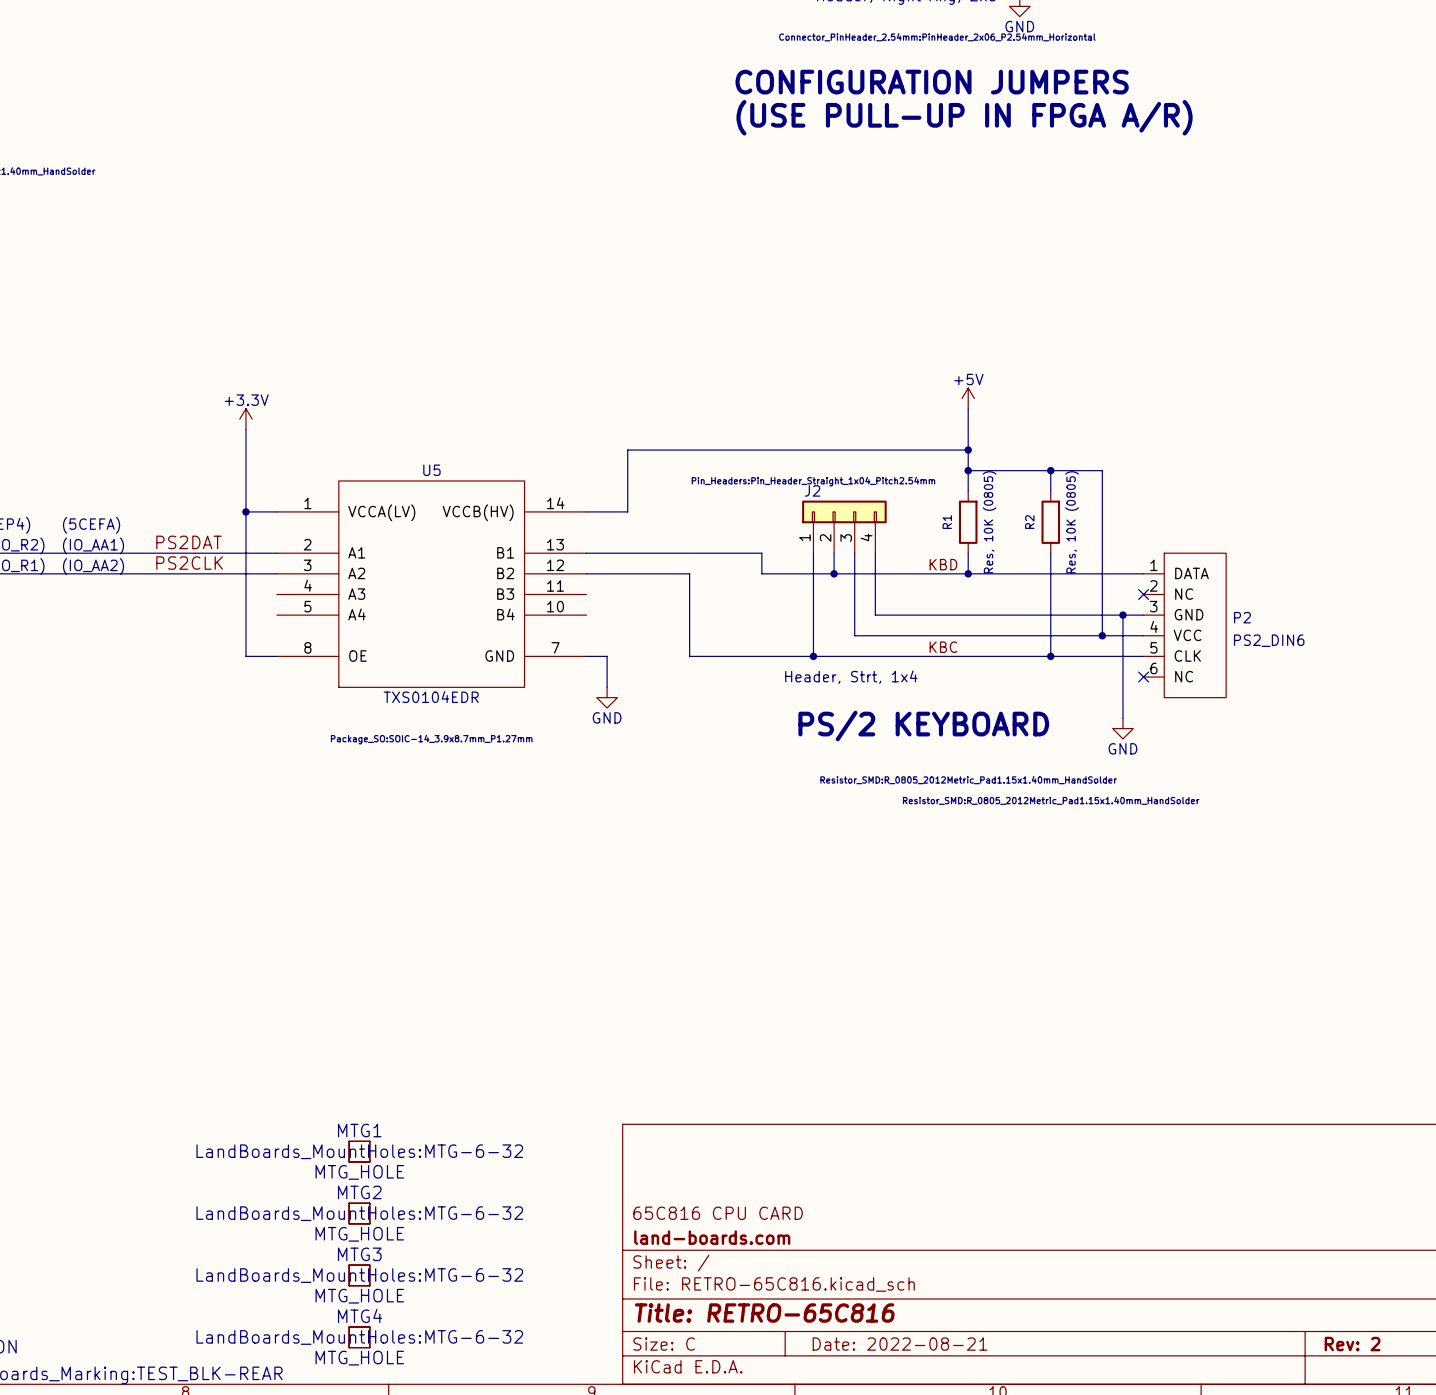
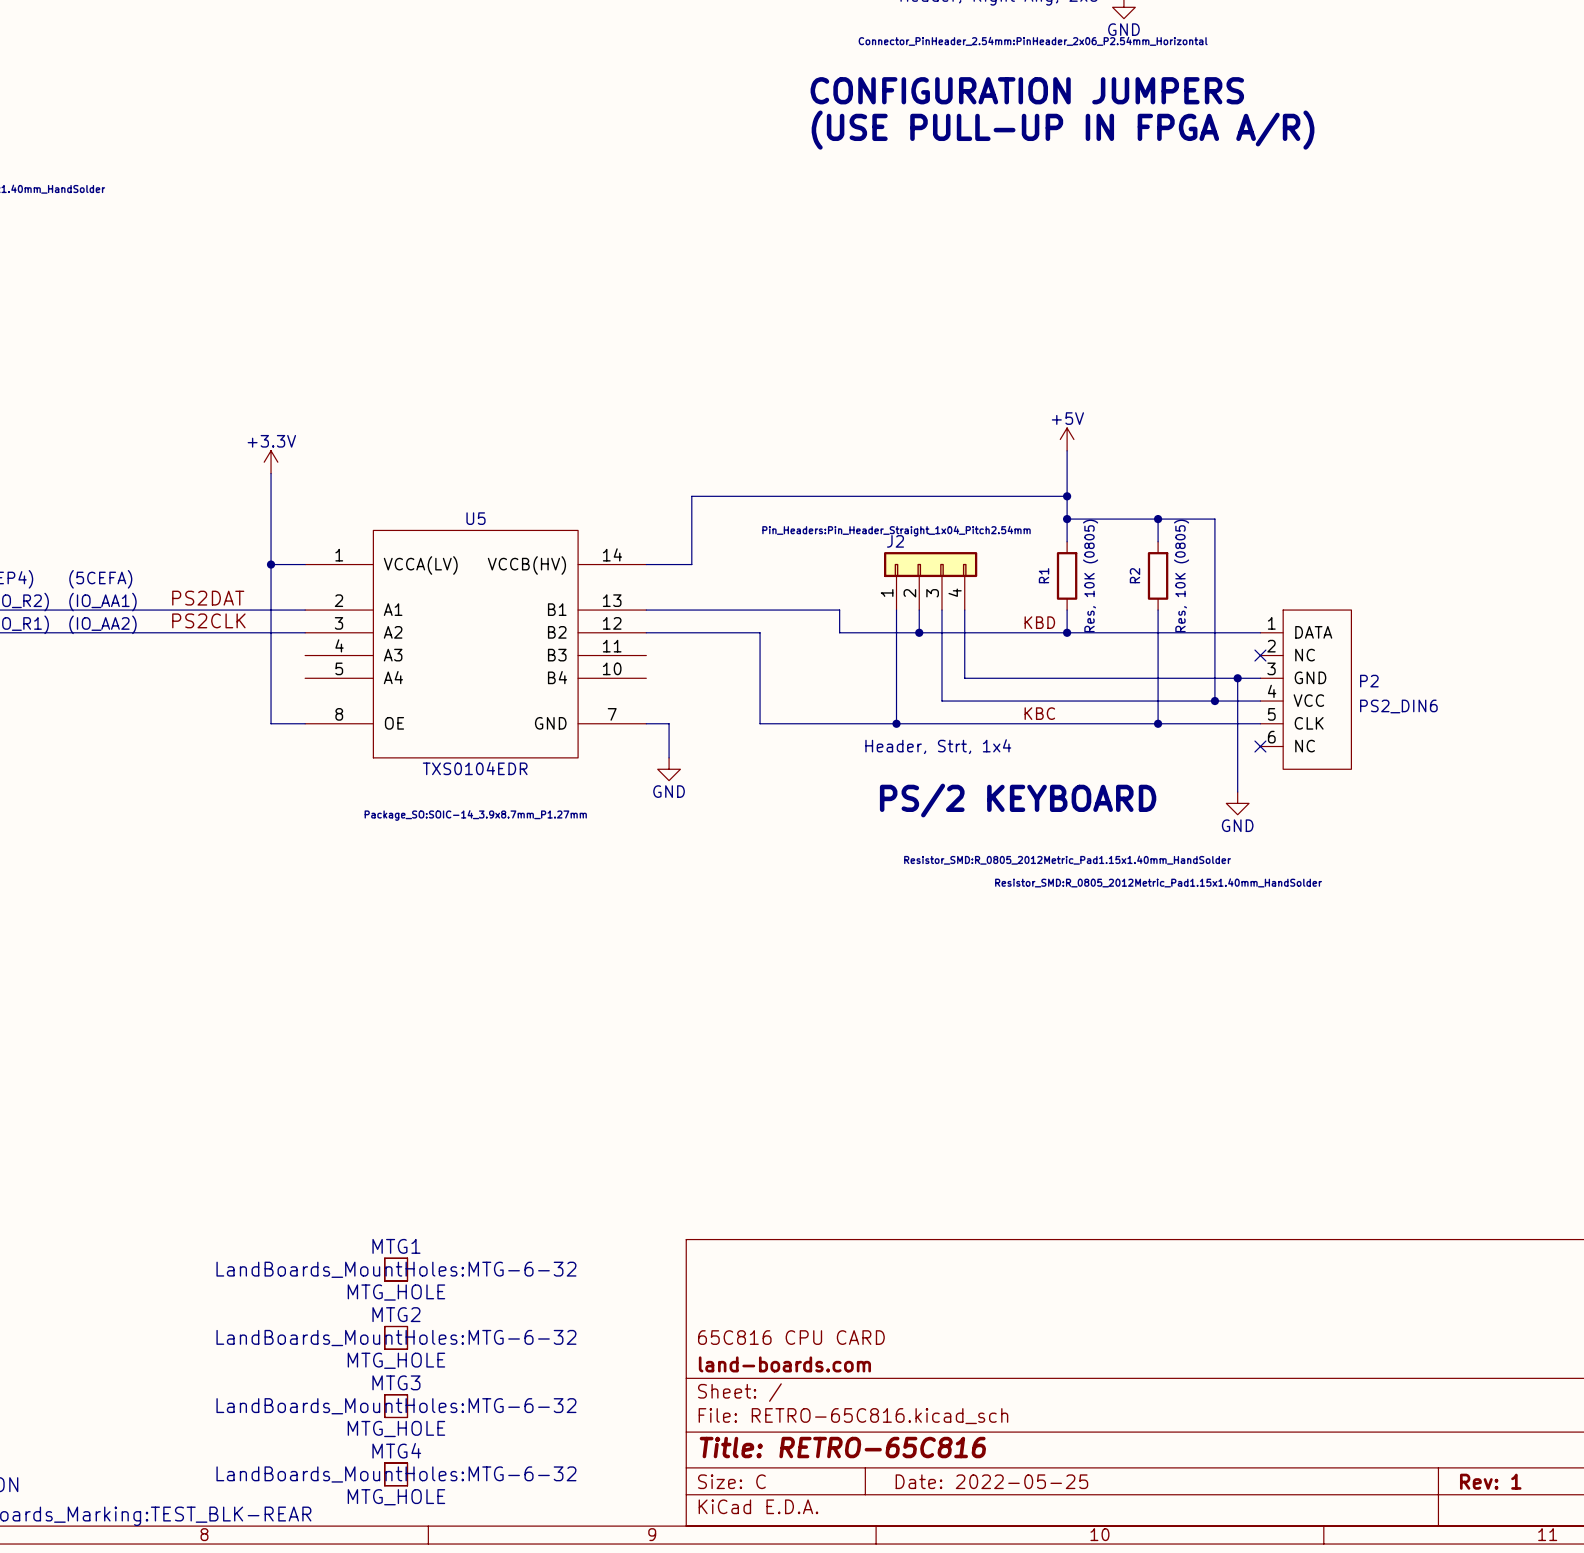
title block: Date: 2022-08-21 (900, 1344) -> Date: 2022-05-25 (991, 1481)
title block: Rev: 2 (1352, 1344) -> Rev: 1 (1490, 1481)

